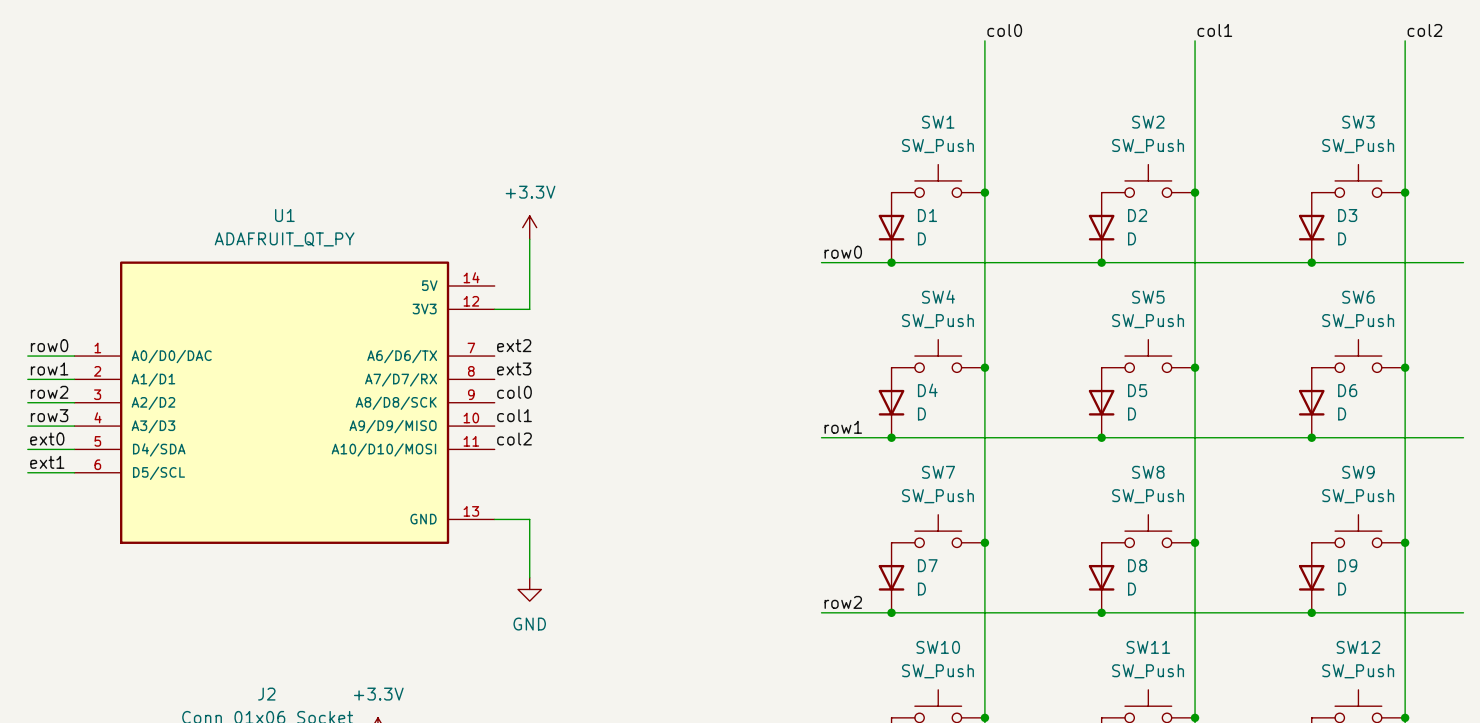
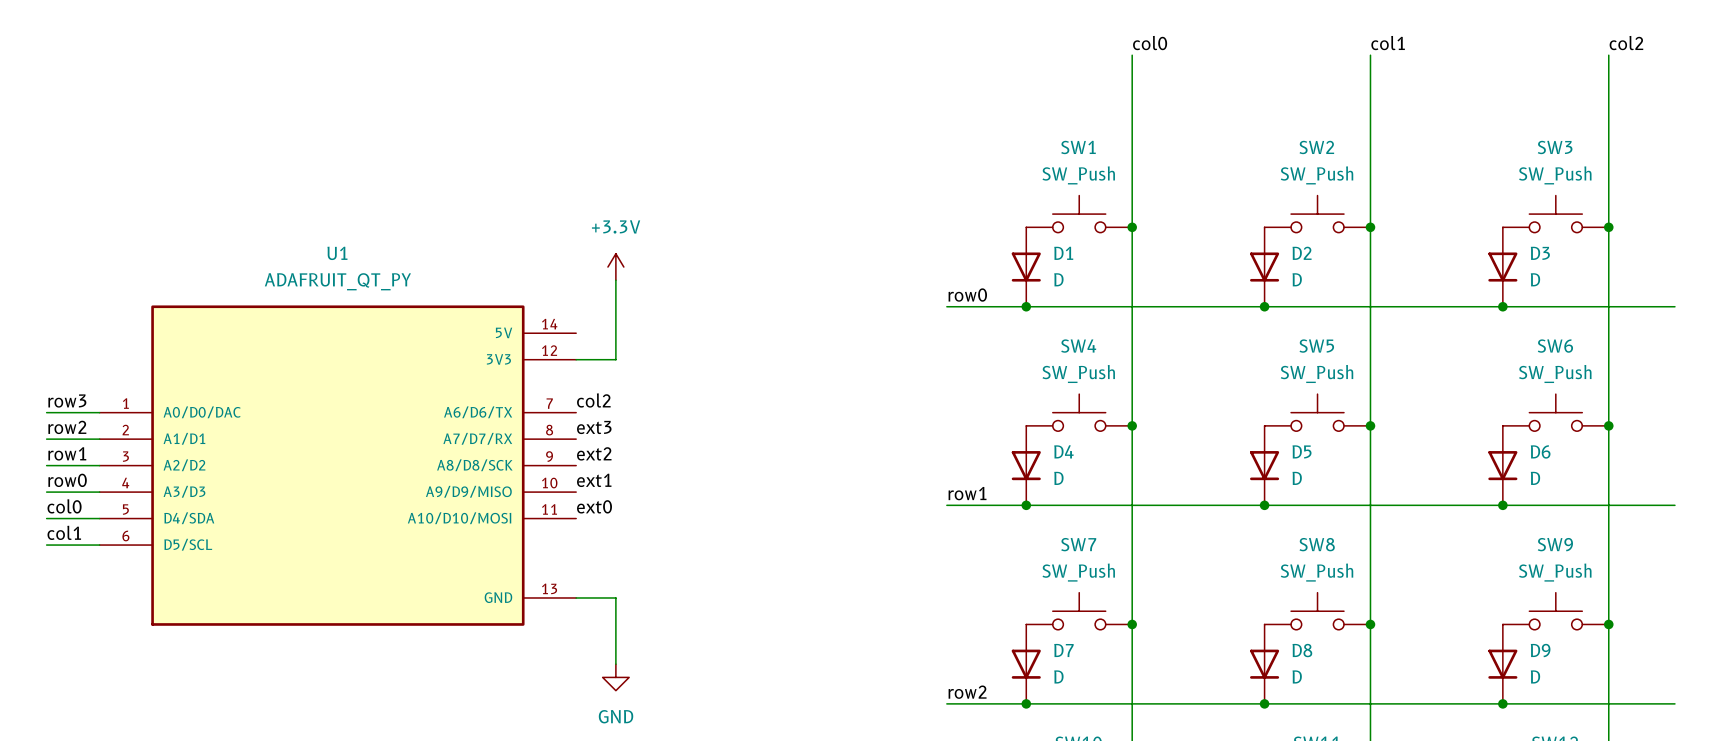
label: row0 (49, 345) -> row3 (67, 401)
label: ext2 (514, 345) -> col2 (593, 400)
label: row1 (49, 368) -> row2 (67, 427)
label: row2 (49, 392) -> row1 (67, 453)
label: col0 (514, 392) -> ext2 (594, 453)
label: row3 (49, 415) -> row0 (67, 480)
label: col1 (514, 415) -> ext1 (594, 480)
label: ext0 (47, 438) -> col0 (64, 506)
label: col2 (514, 438) -> ext0 (594, 506)
label: ext1 (47, 462) -> col1 (64, 532)

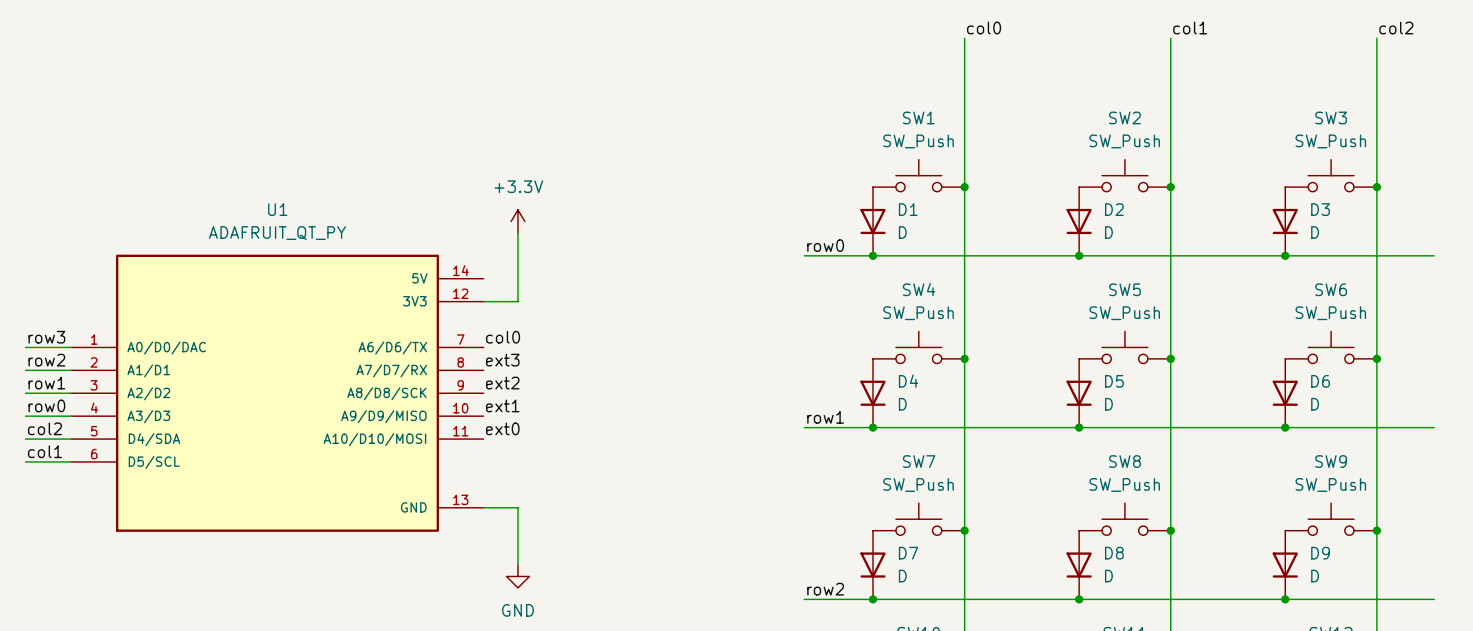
label: col2 (593, 400) -> col0 (503, 337)
label: col0 (64, 506) -> col2 (44, 428)

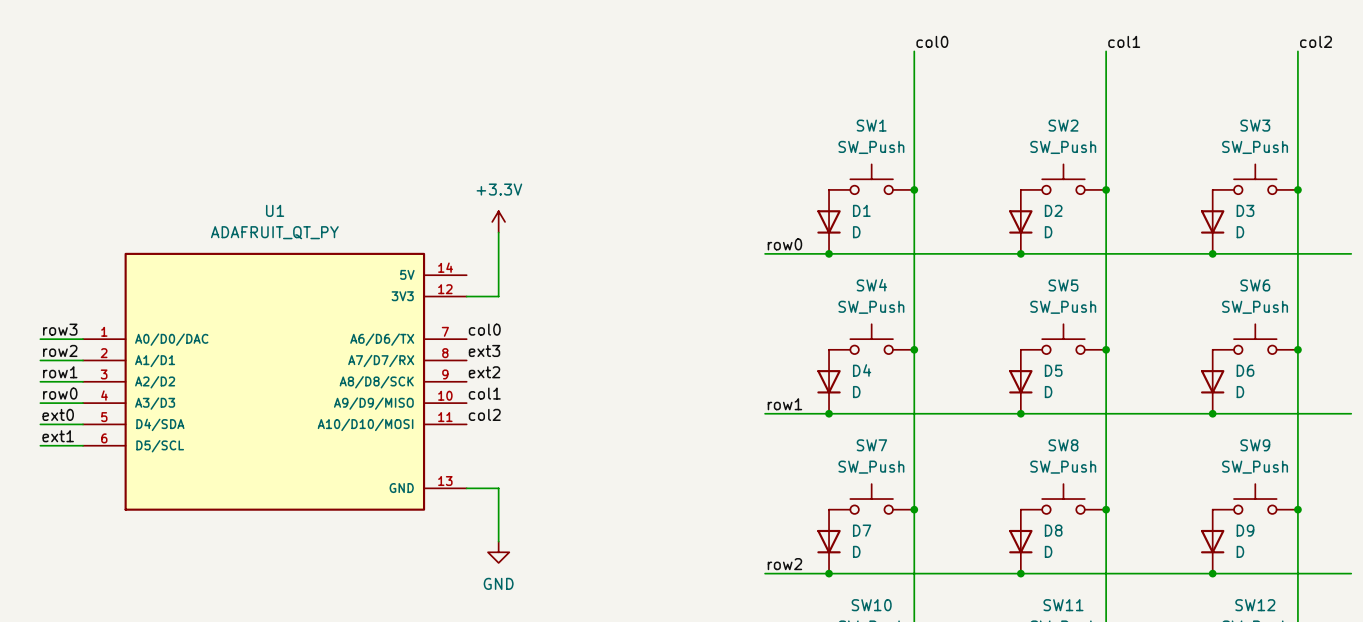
label: ext1 (502, 405) -> col1 (484, 393)
label: col2 (44, 428) -> ext0 (58, 414)
label: ext0 (502, 428) -> col2 (484, 414)
label: col1 (44, 451) -> ext1 (58, 436)

